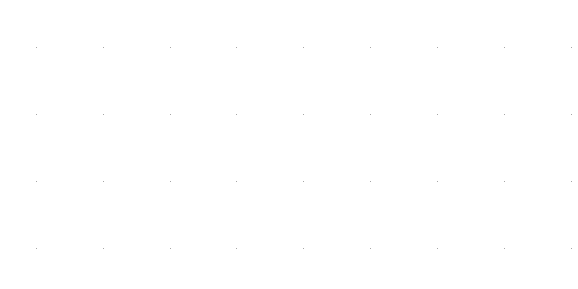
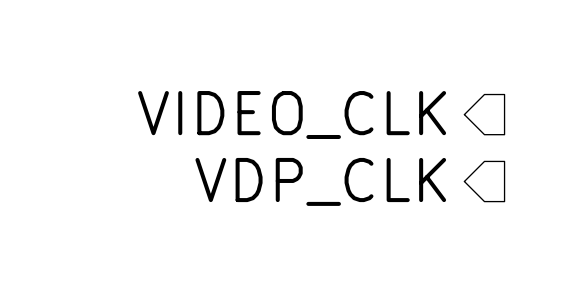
hierarchical label: none -> VIDEO_CLK (292, 115)
hierarchical label: none -> VDP_CLK (320, 181)

